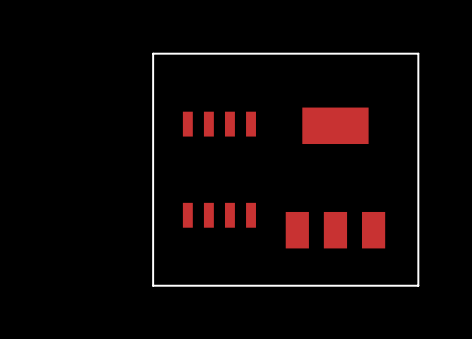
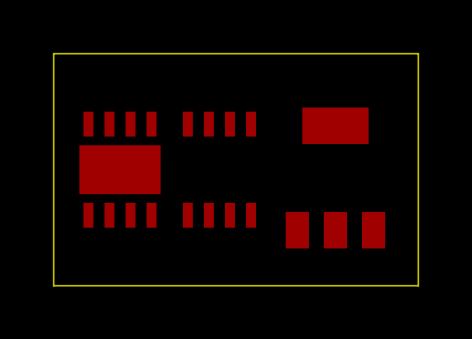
board edge: (153, 53) (153, 285) -> (153, 53) (53, 53) (53, 285) (153, 285)
part: none -> (119, 169)

